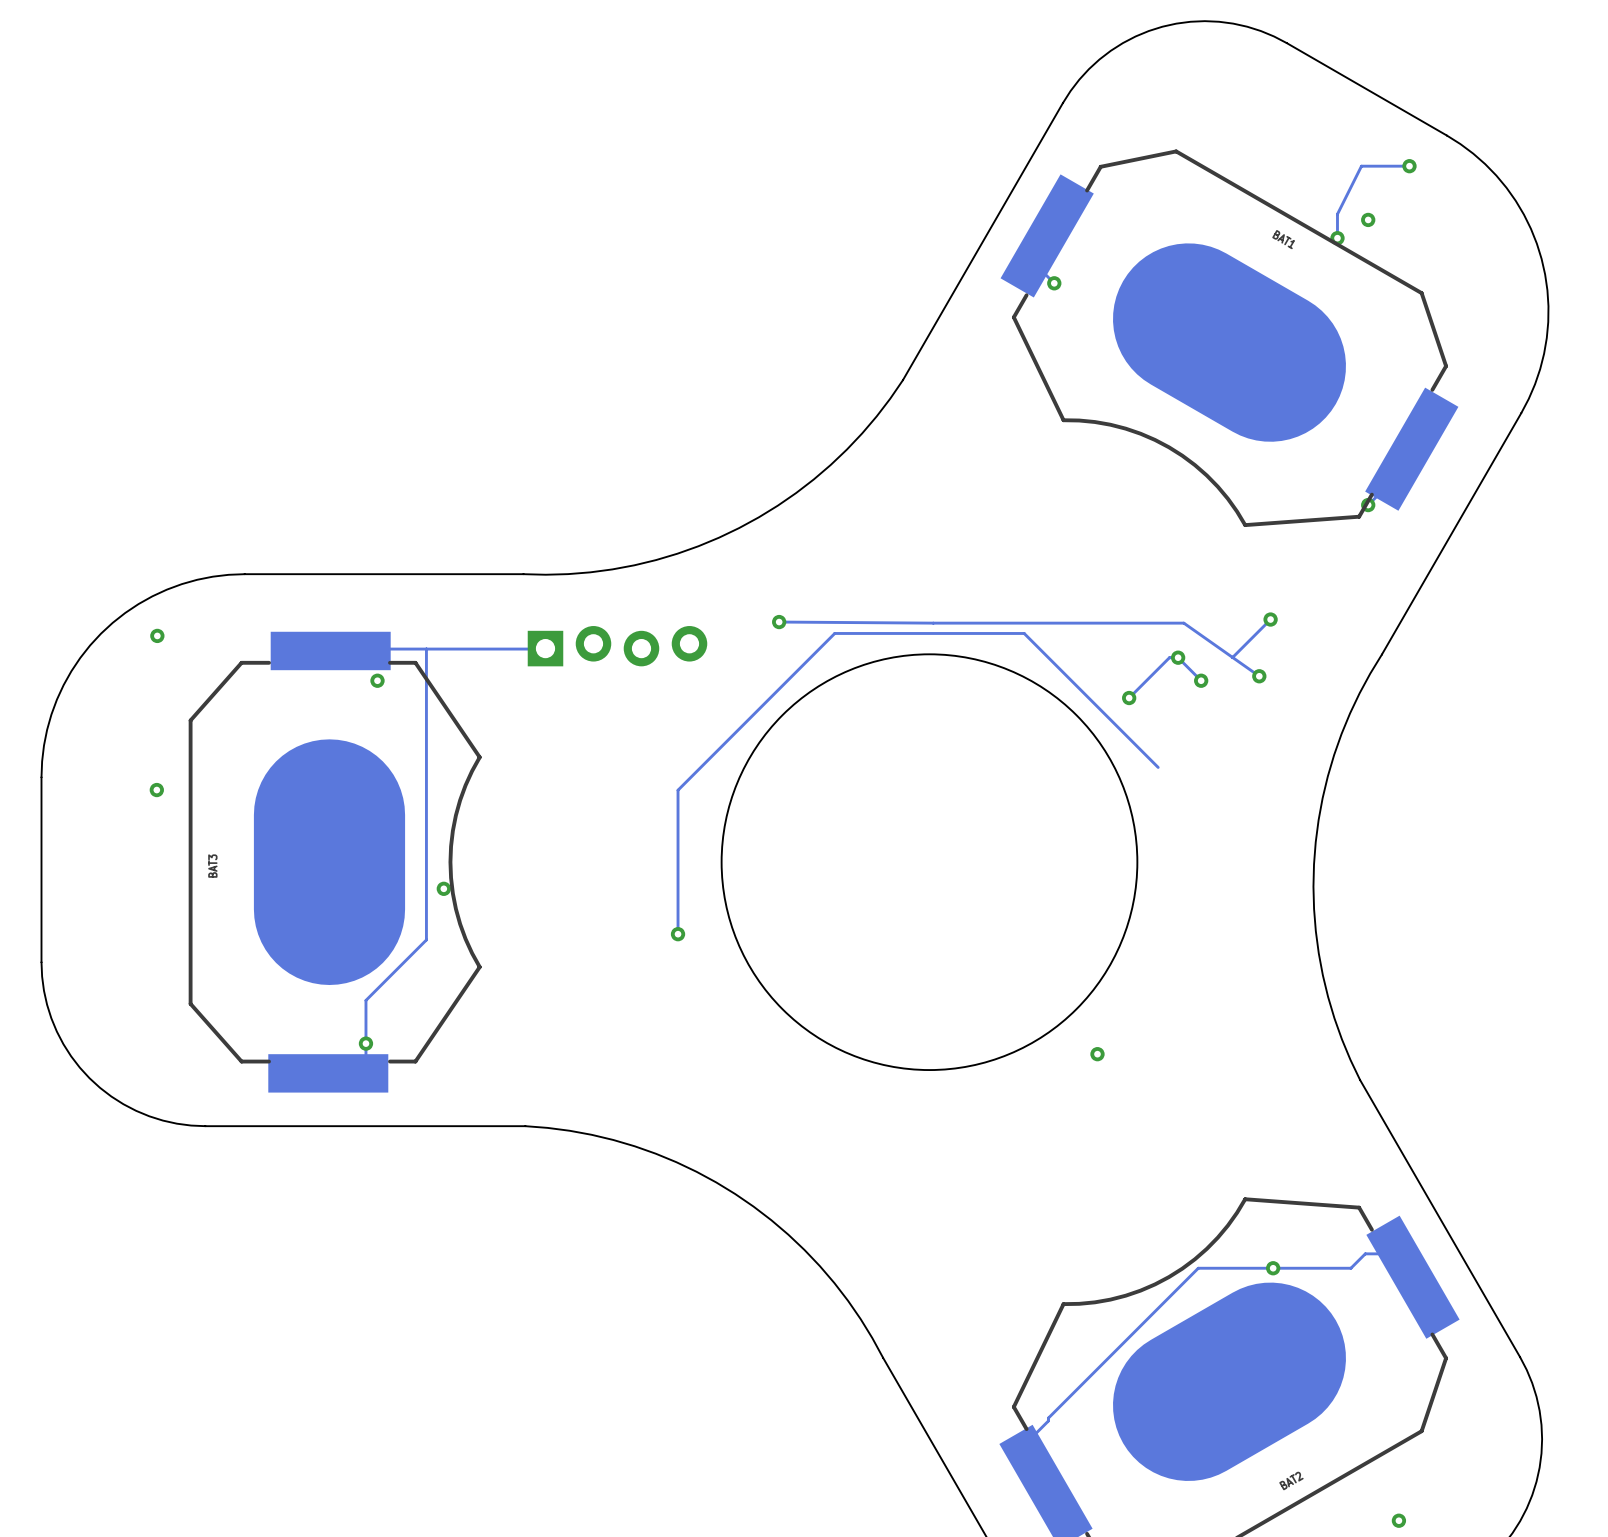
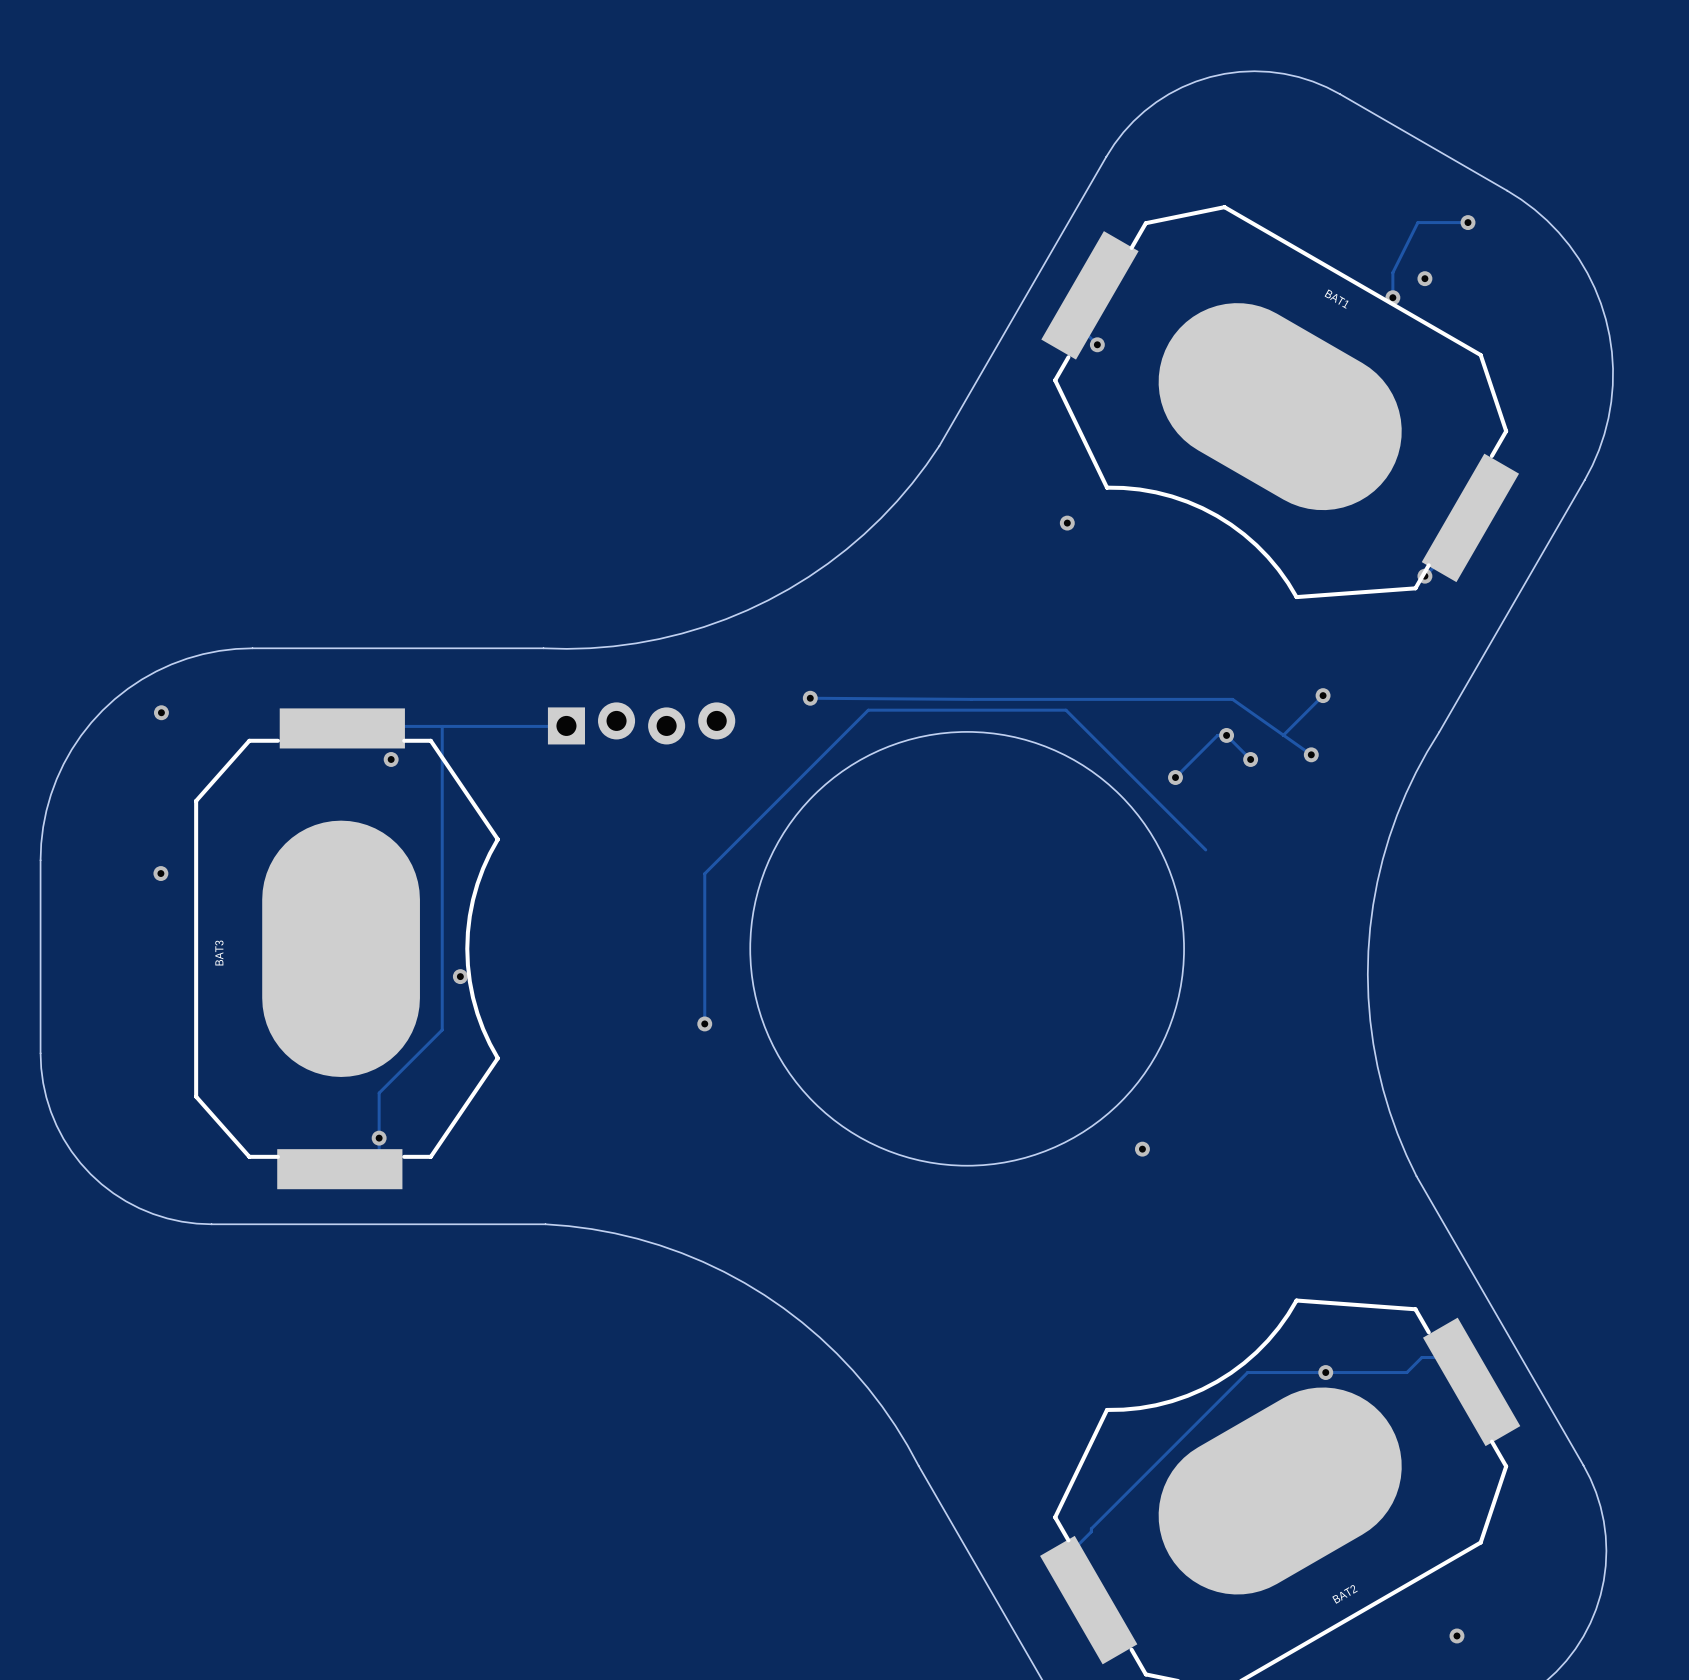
via: none -> (1067, 523)

